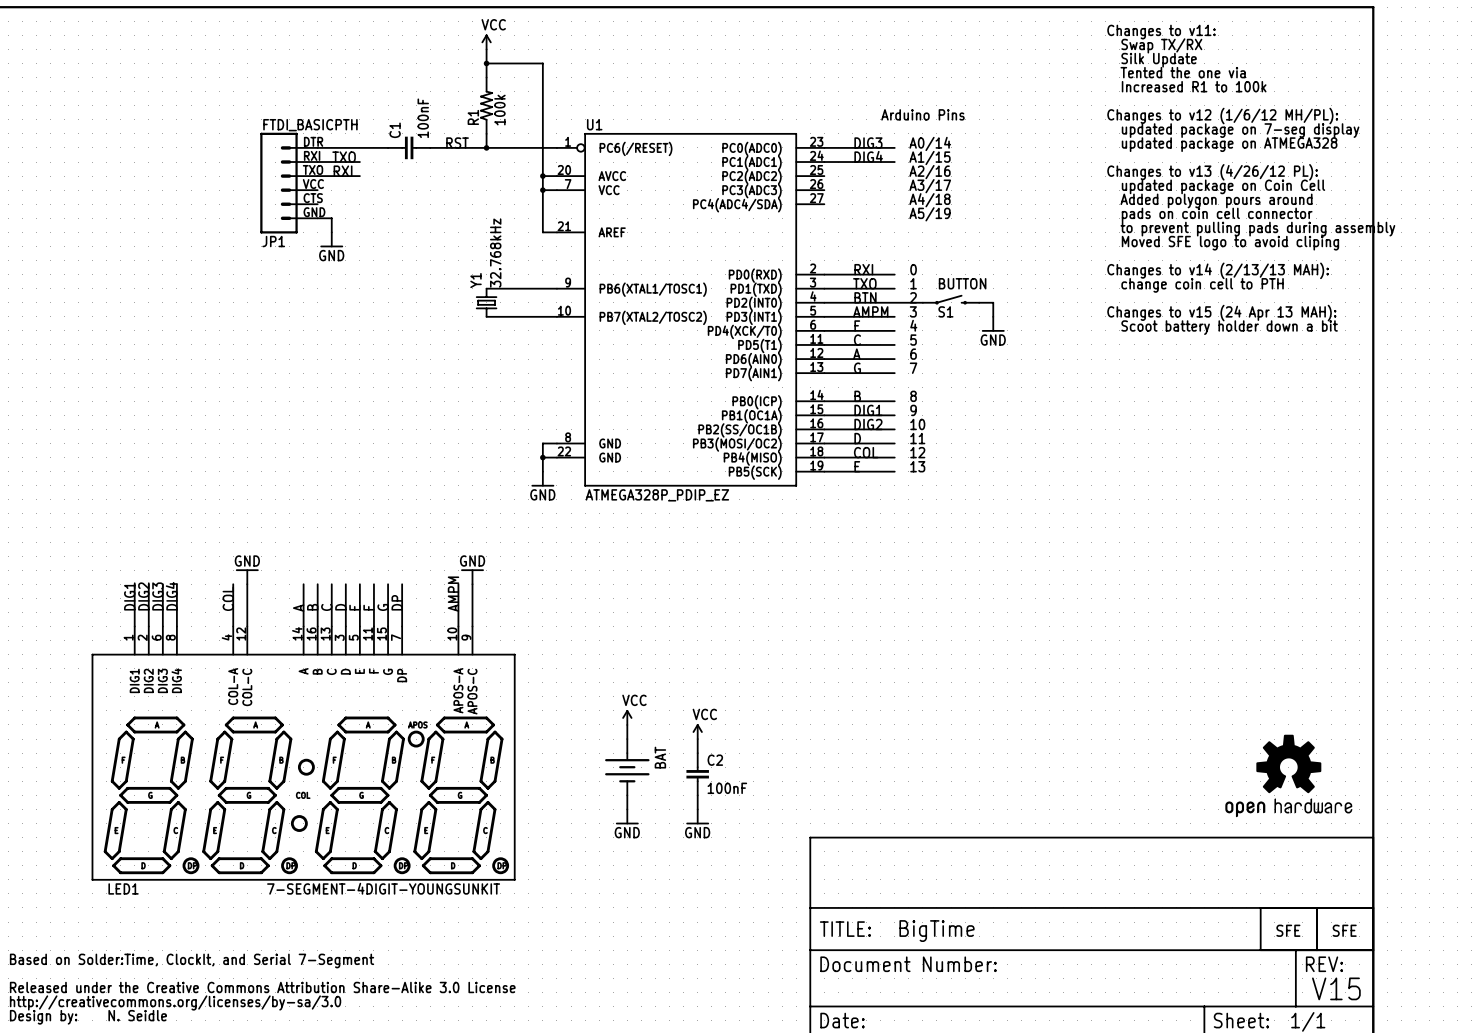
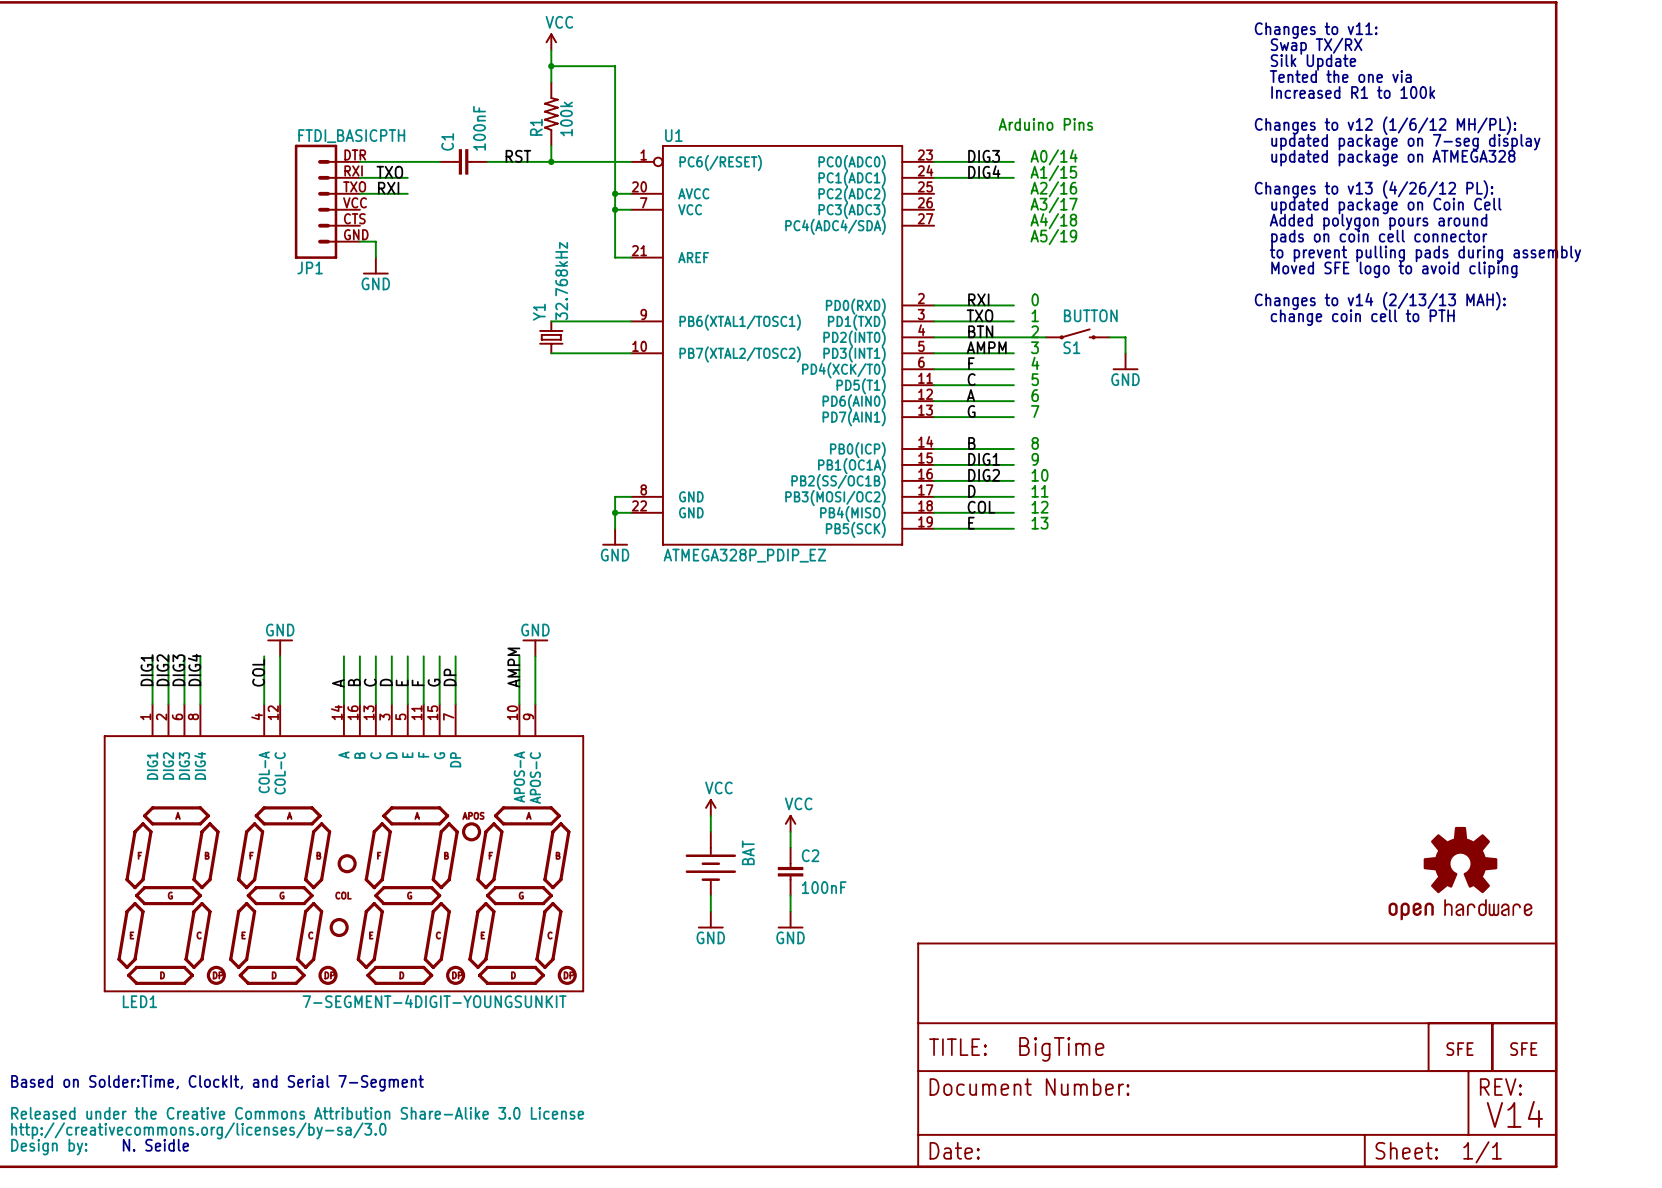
text: Changes to v15 (24 Apr 13 MAH): (1221, 313) -> none
text: Scoot battery holder down a bit (1229, 327) -> none
text: V15 (1336, 988) -> V14 (1514, 1114)

